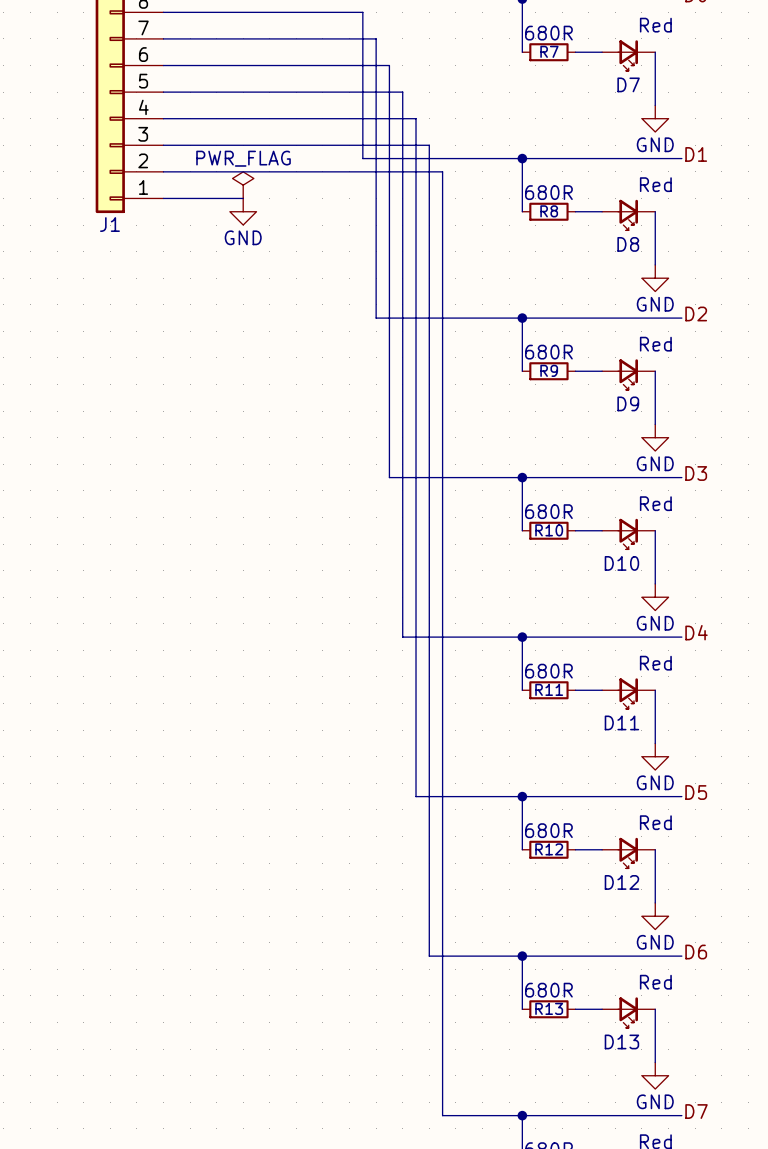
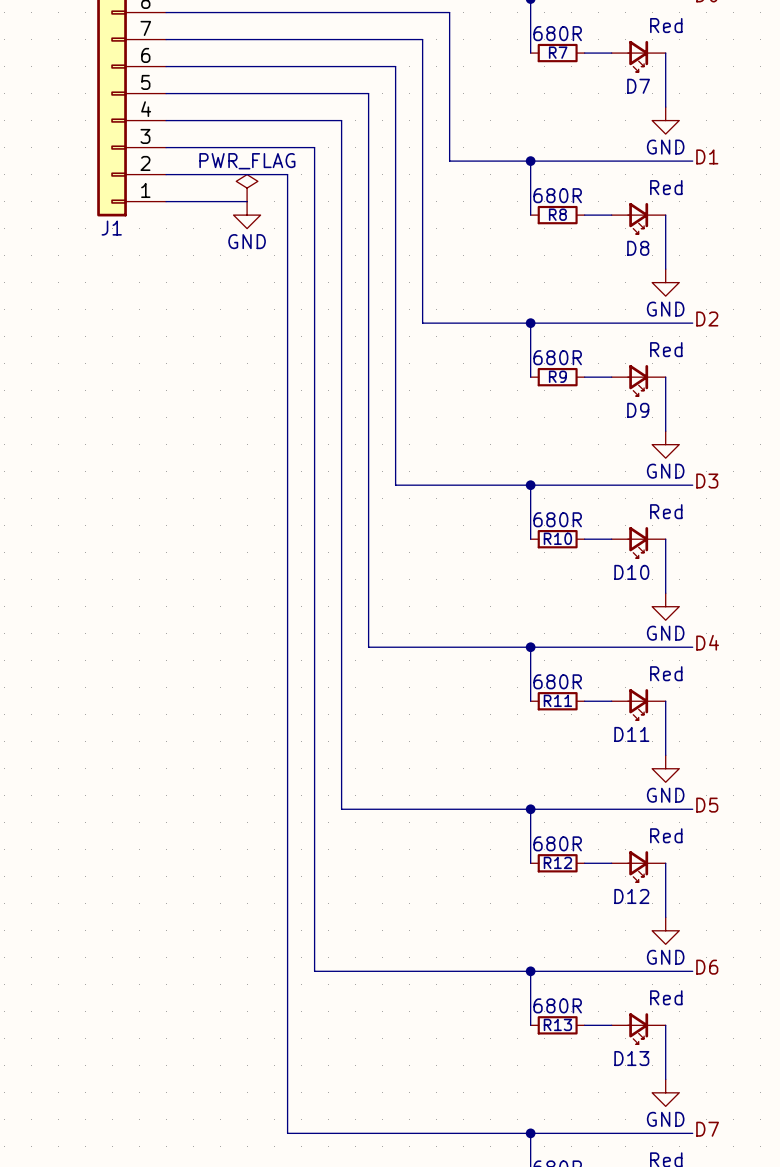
wire: (362, 12) (362, 92) (402, 92) (402, 637) -> (368, 161) (368, 647) (409, 647)
wire: (376, 38) (376, 318) (416, 318) (416, 796) -> (341, 120) (341, 809) (422, 809)
wire: (336, 118) (416, 118) -> (382, 39) (422, 39) (422, 120)
wire: (309, 145) (429, 145) (429, 956) -> (314, 147) (314, 971) (436, 971)
wire: (362, 158) (442, 158) -> (368, 12) (449, 12) (449, 161)
wire: (283, 171) (442, 171) (442, 1115) -> (287, 174) (287, 1133) (449, 1133)

